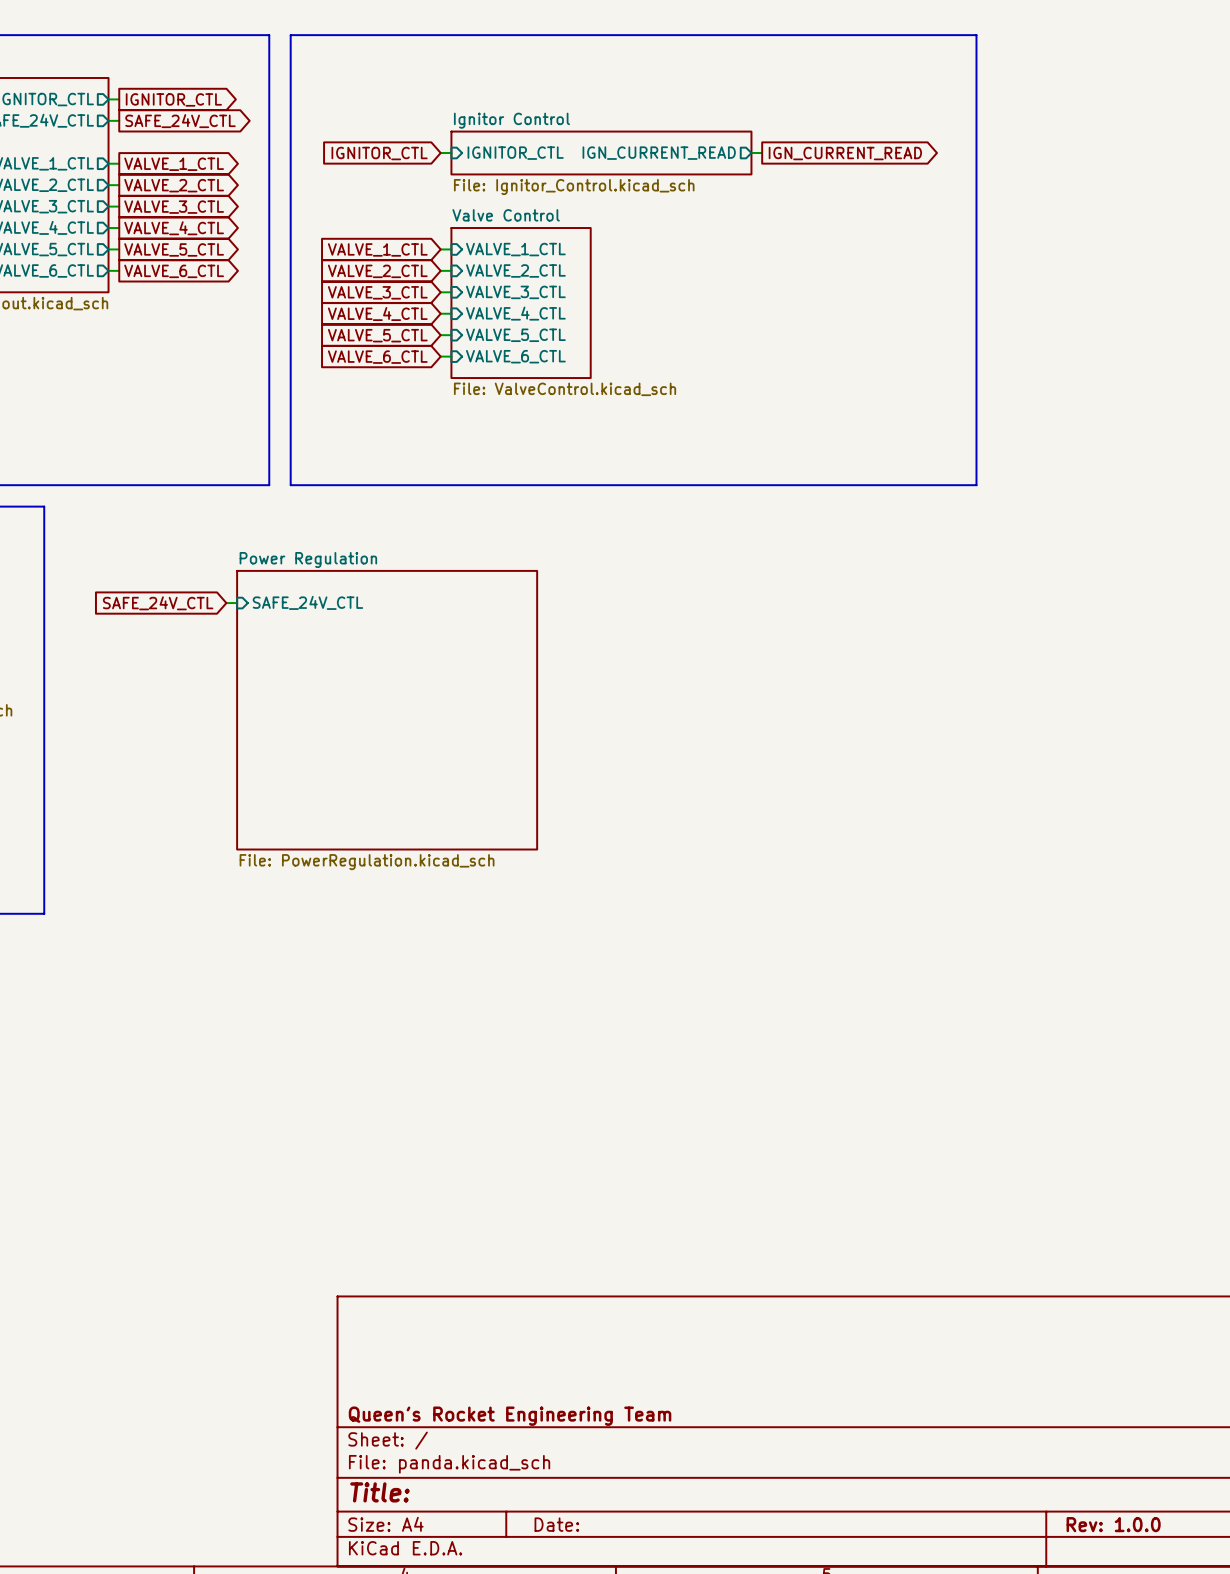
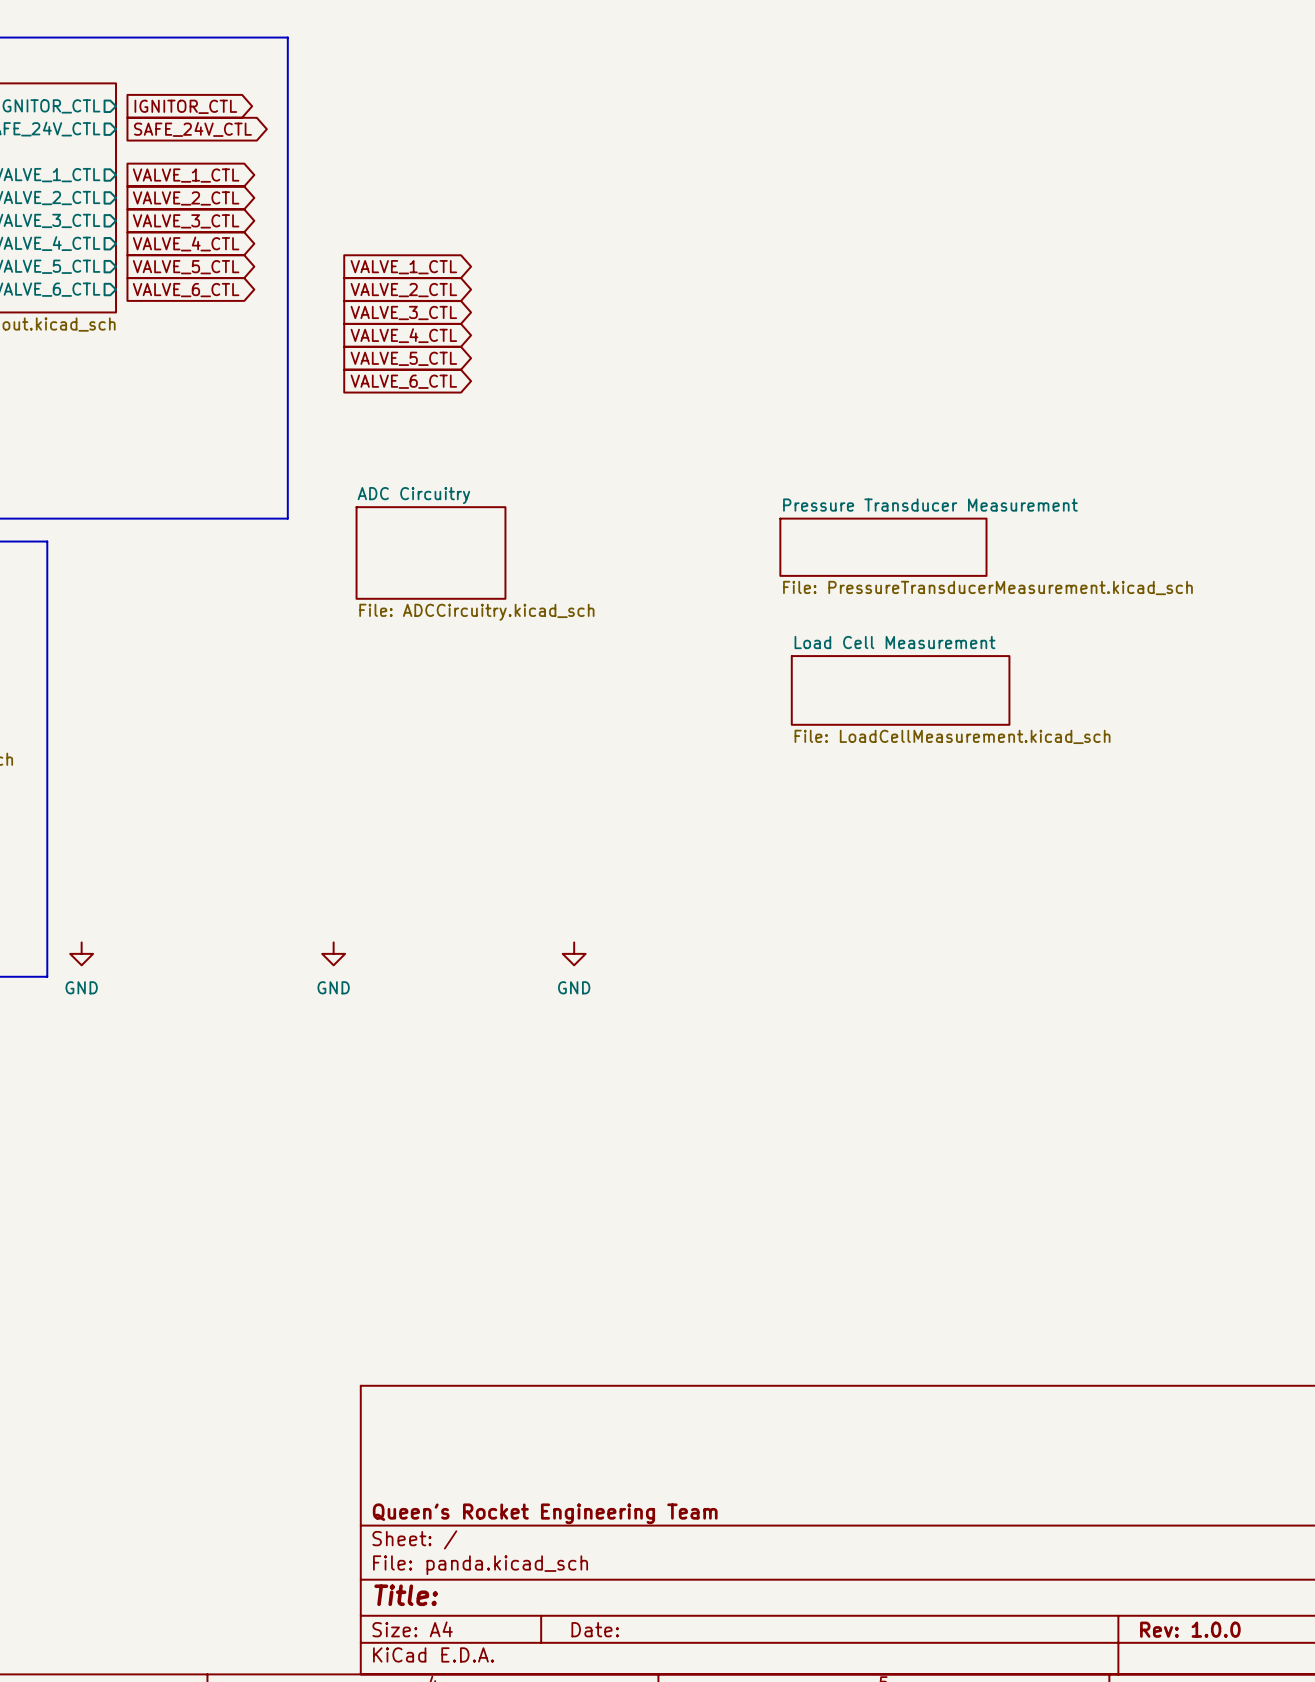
line: (290, 35) (976, 35) (976, 485) (290, 485) (290, 35) -> none
wire: (108, 99) (119, 99) -> none
wire: (108, 120) (119, 120) -> none
global label: IGNITOR_CTL (379, 153) -> none
wire: (440, 153) (451, 153) -> none
sheet pin: IGNITOR_CTL (515, 153) -> none
sheet Ignitor Control: File: Ignitor_Control.kicad_sch (601, 153) -> none
sheet pin: IGN_CURRENT_READ (659, 153) -> none
wire: (751, 153) (762, 153) -> none
global label: IGN_CURRENT_READ (845, 153) -> none
wire: (108, 163) (119, 163) -> none
wire: (108, 185) (119, 185) -> none
wire: (108, 206) (119, 206) -> none
wire: (108, 228) (119, 228) -> none
wire: (108, 249) (119, 249) -> none
wire: (440, 249) (451, 249) -> none
sheet pin: VALVE_1_CTL (515, 249) -> none
wire: (108, 270) (119, 270) -> none
wire: (440, 270) (451, 270) -> none
sheet pin: VALVE_2_CTL (515, 270) -> none
wire: (440, 292) (451, 292) -> none
sheet pin: VALVE_3_CTL (515, 292) -> none
sheet Valve Control: File: ValveControl.kicad_sch (521, 303) -> none
wire: (440, 313) (451, 313) -> none
sheet pin: VALVE_4_CTL (515, 313) -> none
wire: (440, 335) (451, 335) -> none
sheet pin: VALVE_5_CTL (515, 335) -> none
wire: (440, 356) (451, 356) -> none
sheet pin: VALVE_6_CTL (515, 356) -> none
sheet Pressure Transducer Measurement: none -> File: PressureTransducerMeasurement.kicad_sch (883, 547)
sheet ADC Circuitry: none -> File: ADCCircuitry.kicad_sch (430, 552)
sheet pin: SAFE_24V_CTL (307, 602) -> none
global label: SAFE_24V_CTL (158, 603) -> none
wire: (226, 603) (237, 603) -> none
sheet Load Cell Measurement: none -> File: LoadCellMeasurement.kicad_sch (900, 690)
sheet Power Regulation: File: PowerRegulation.kicad_sch (387, 710) -> none
power symbol: none -> GND (81, 953)
power symbol: none -> GND (333, 953)
power symbol: none -> GND (574, 953)

